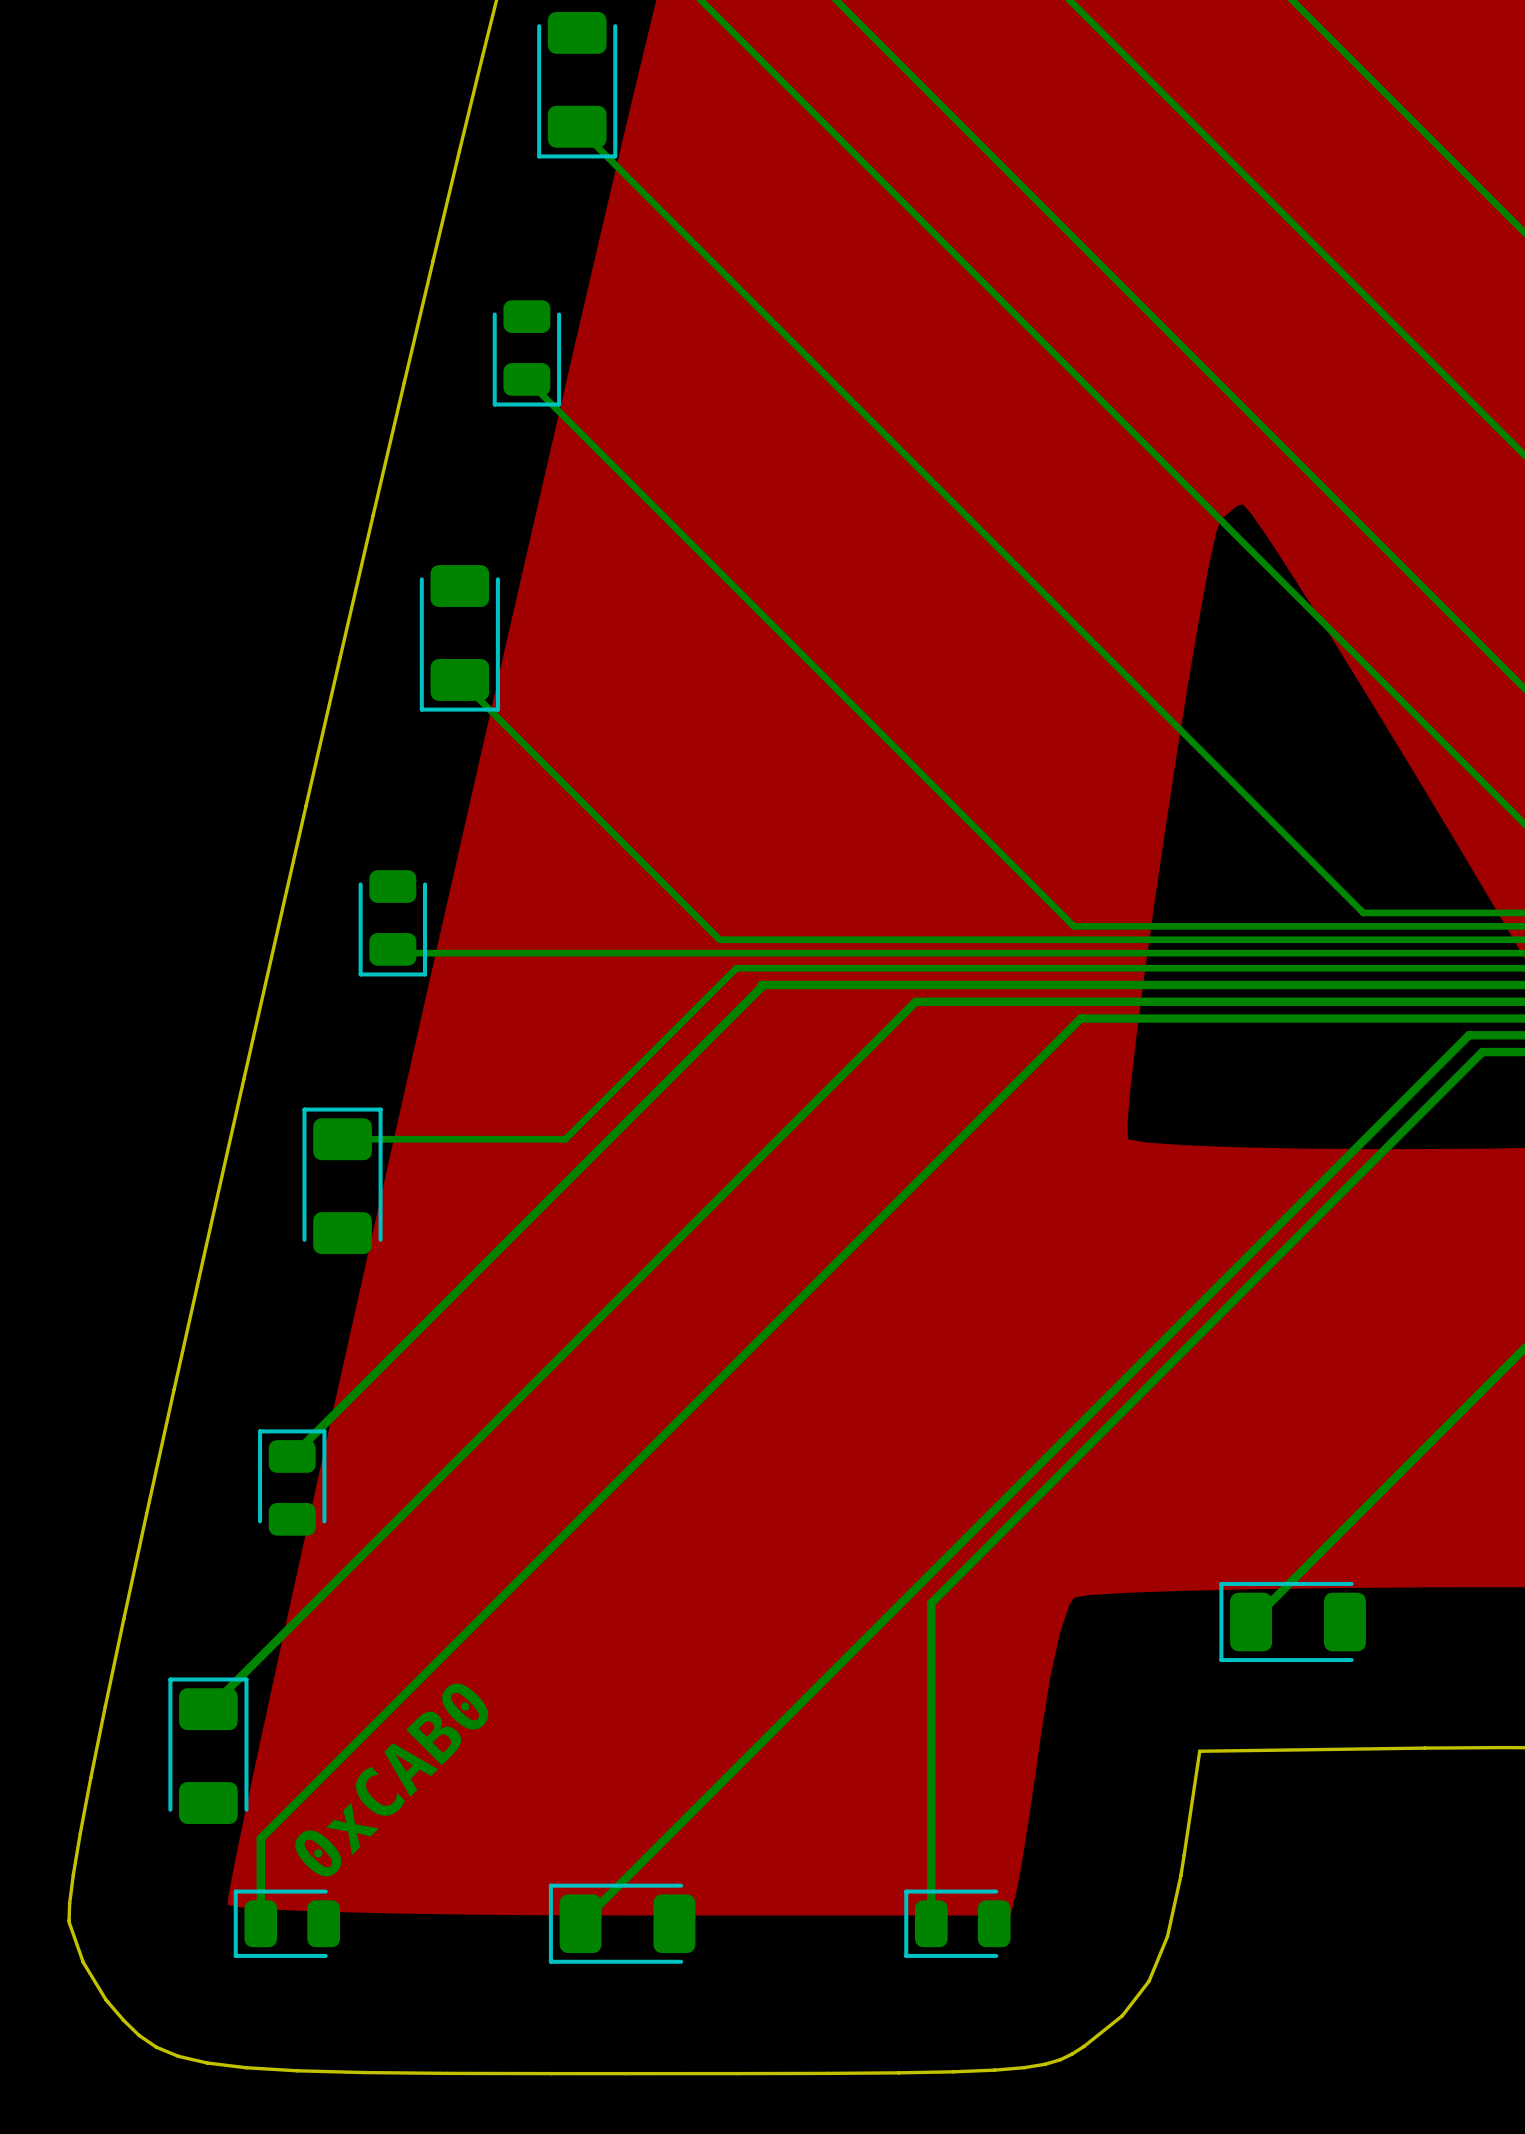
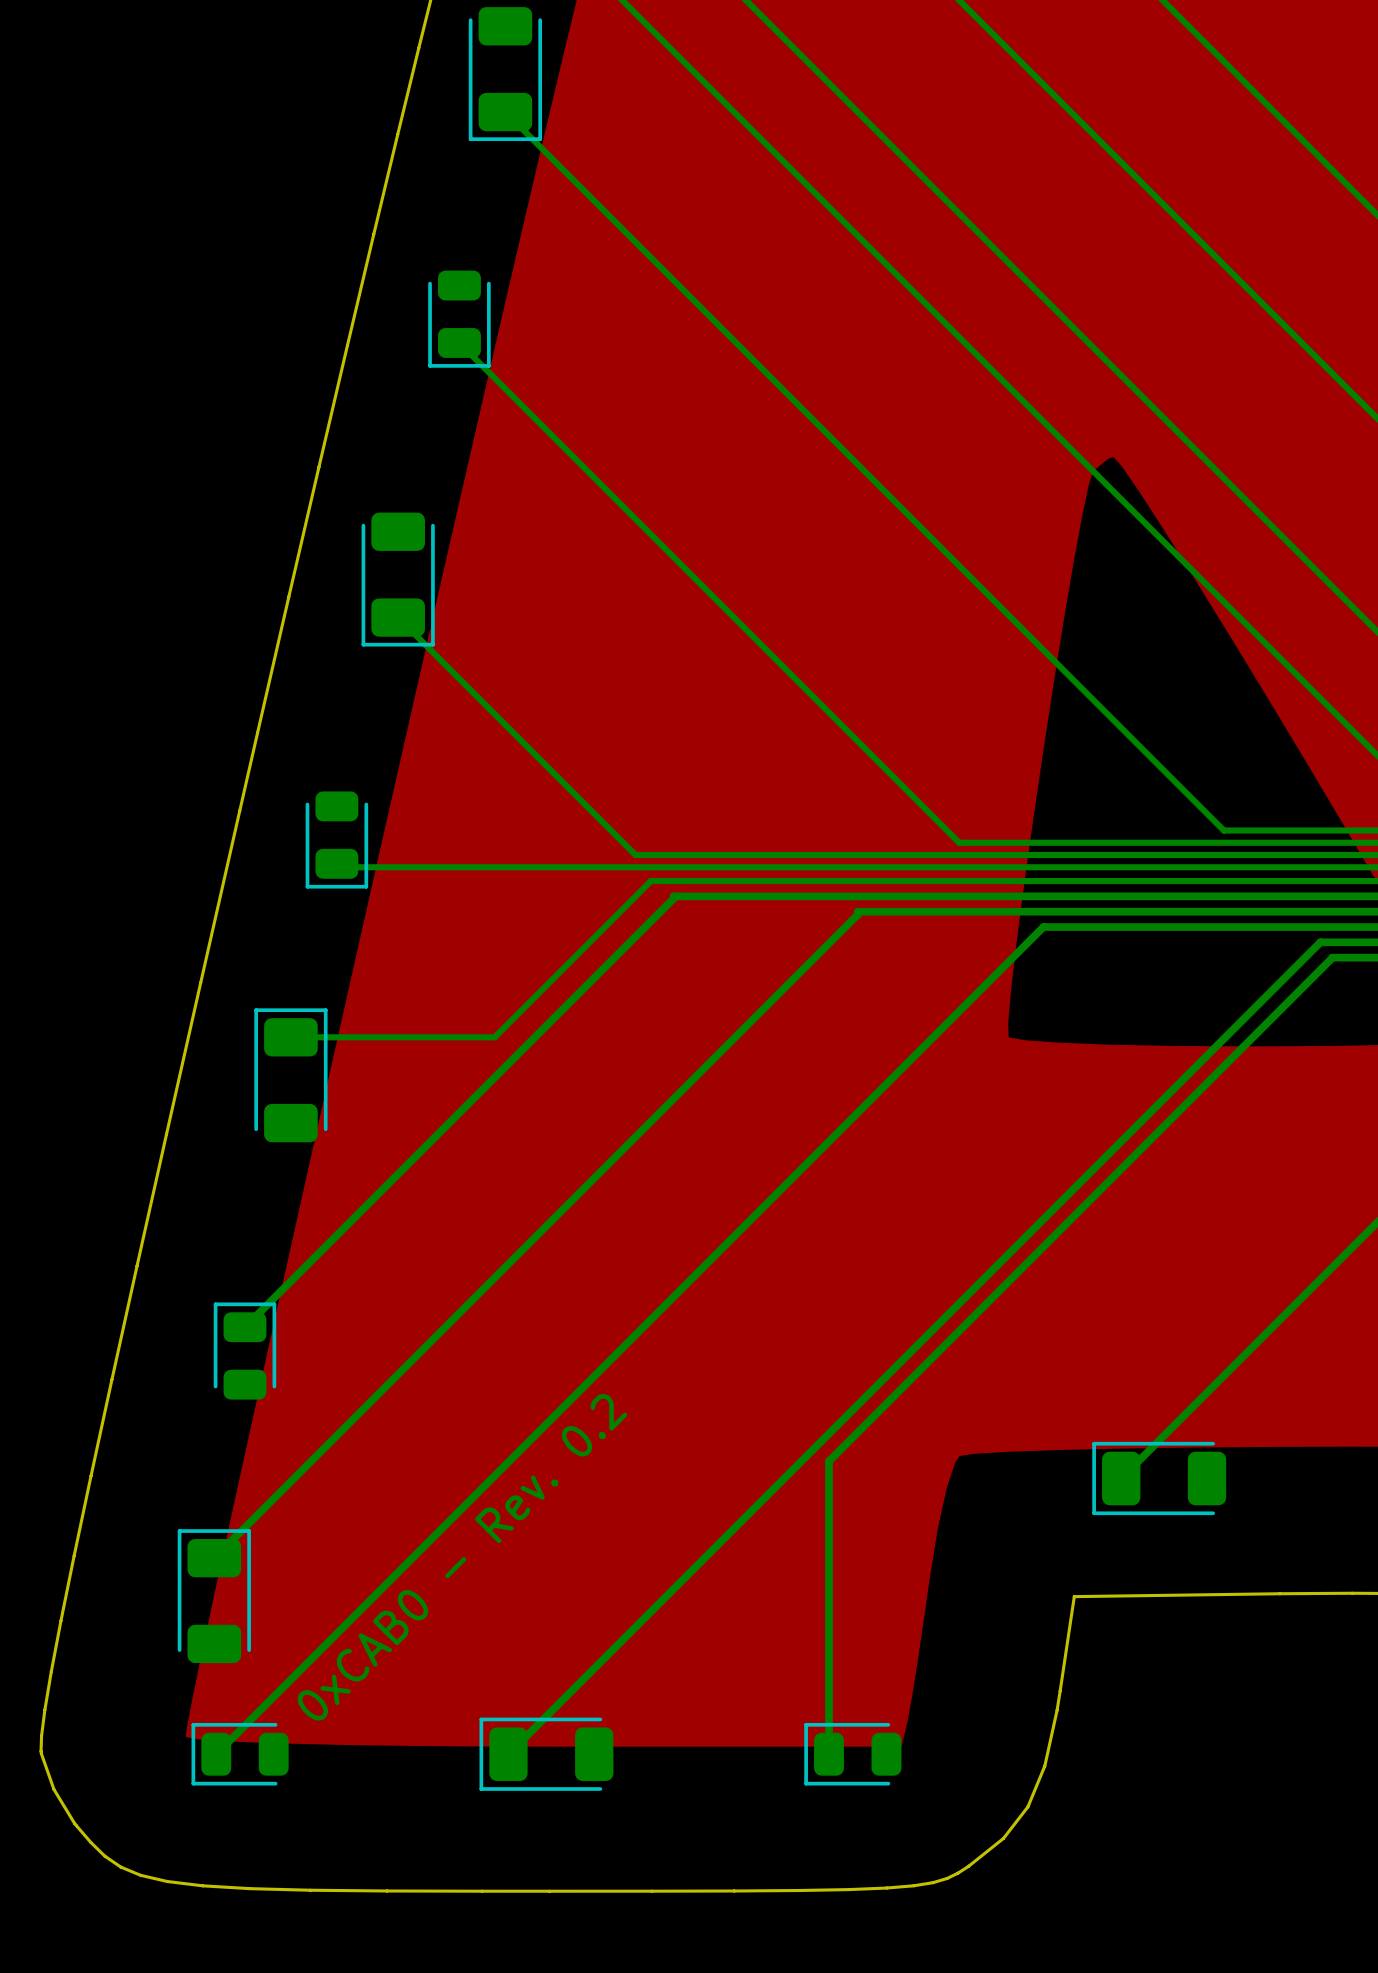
bottom track: (962, 1001) (915, 1001) (208, 1709) -> (857, 911) (857, 914) (214, 1558)
bottom track: (1166, 1018) (1080, 1018) (260, 1838) (260, 1923) -> (1043, 927) (216, 1754)
text: none -> 0xCAB0 - Rev. 0.2 (462, 1557)
part position: (208, 1750) -> (214, 1596)
text: 0xCAB0 (391, 1780) -> none

